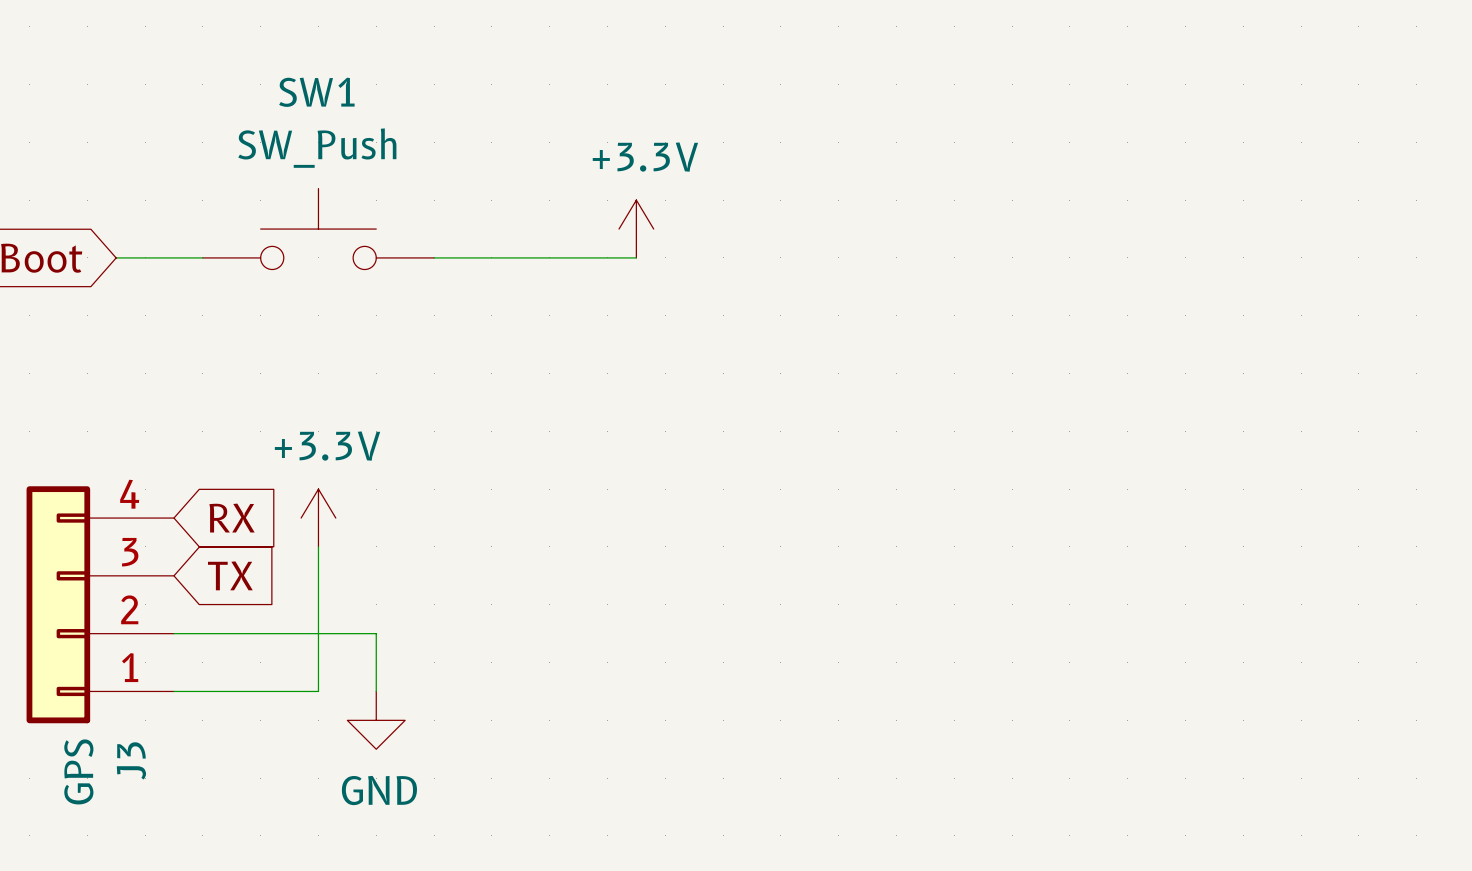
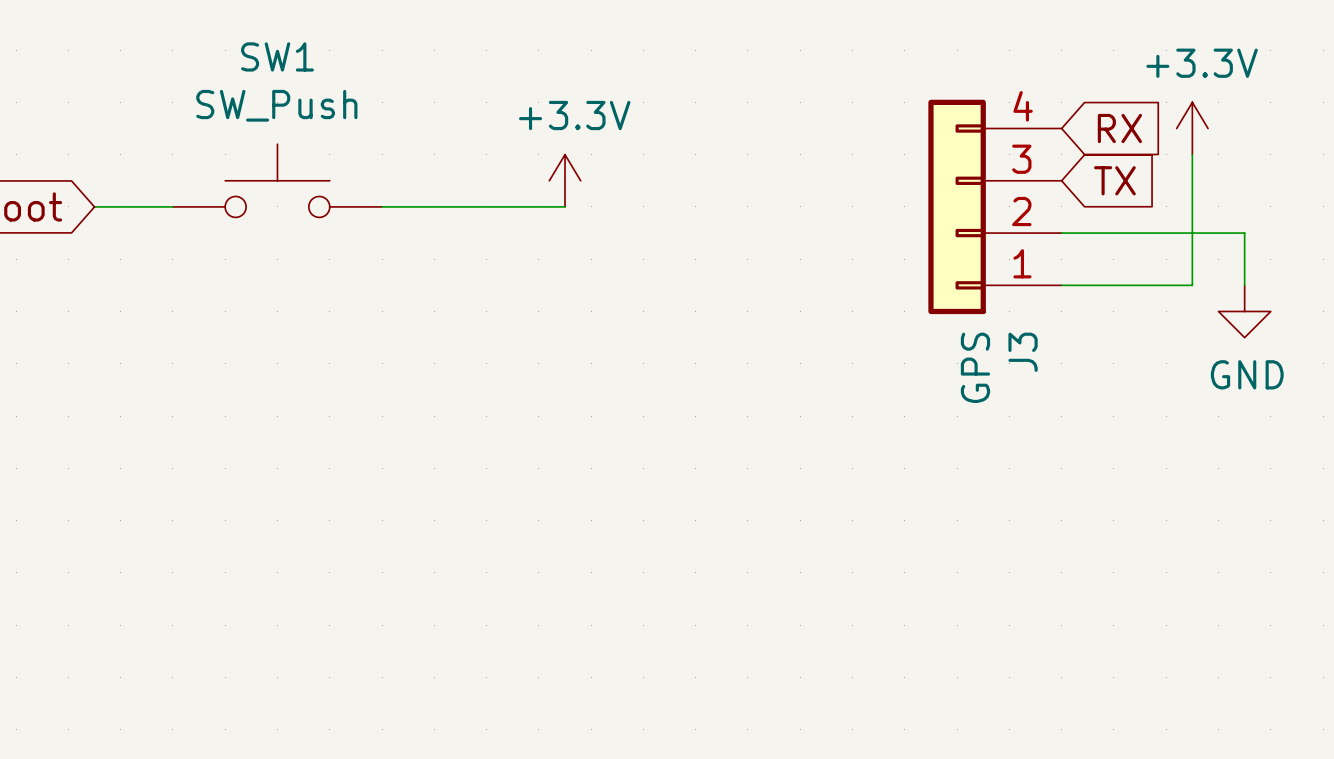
global label: none -> RX (1119, 128)
power symbol: none -> +3.3V (1192, 128)
wire: none -> (1192, 154) (1192, 285) (1061, 285)
global label: none -> TX (1114, 180)
wire: none -> (1061, 233) (1244, 233) (1244, 285)
power symbol: none -> GND (1244, 311)
global label: RX (232, 518) -> none
power symbol: +3.3V (318, 518) -> none
wire: (318, 546) (318, 691) (173, 691) -> none
global label: TX (230, 575) -> none
J3 position: (100, 604) -> (995, 206)
wire: (173, 633) (376, 633) (376, 691) -> none
power symbol: GND (376, 720) -> none

